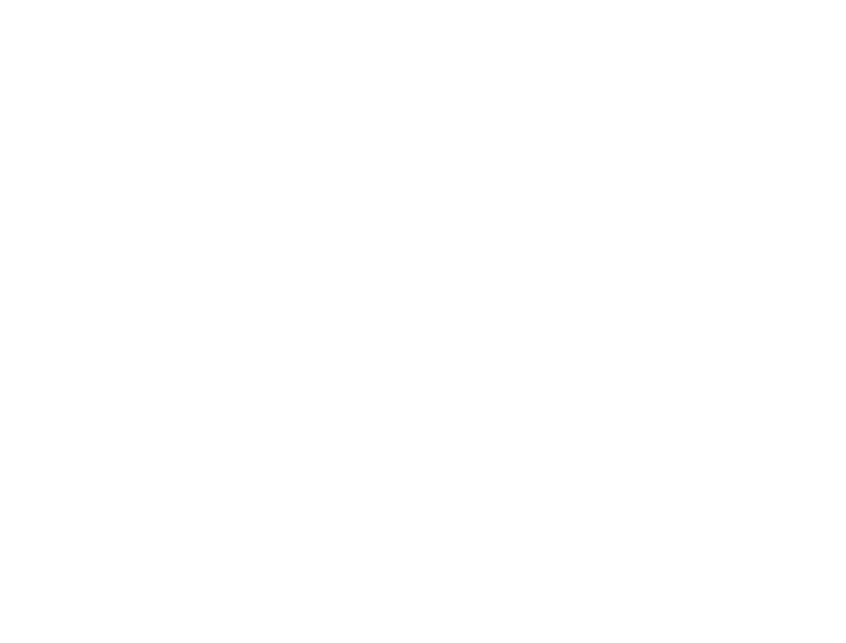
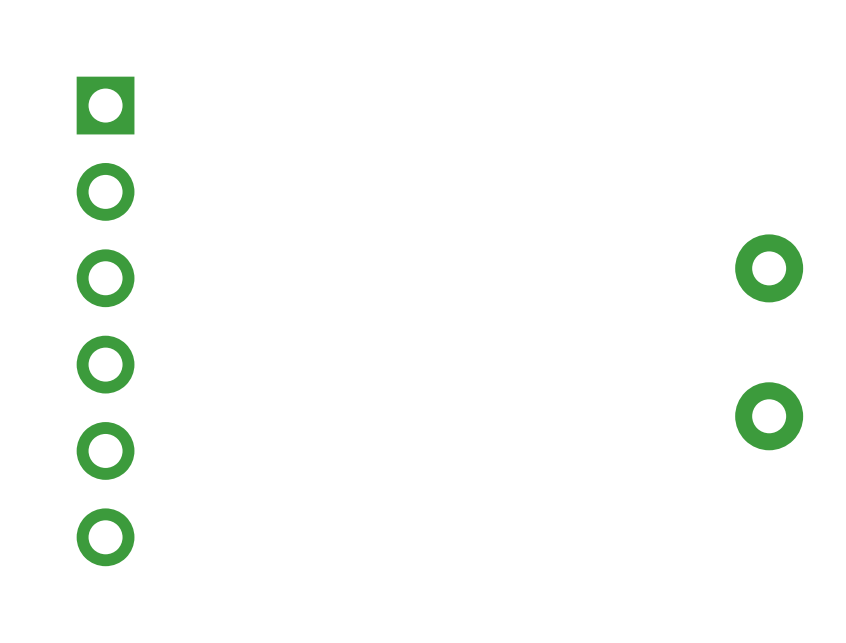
part: none -> (769, 268)
part: none -> (105, 321)
part: none -> (769, 416)

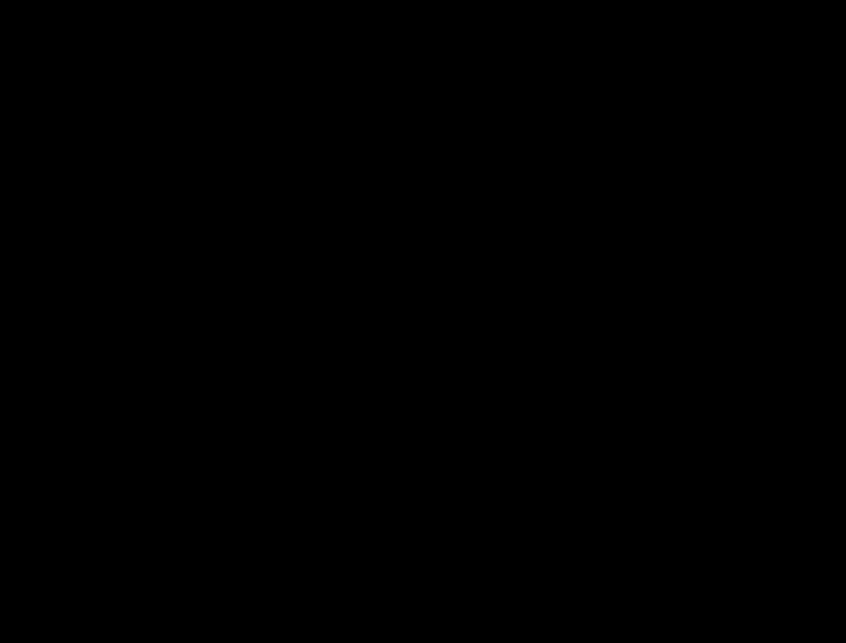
part: (769, 268) -> none
part: (105, 321) -> none
part: (769, 416) -> none

